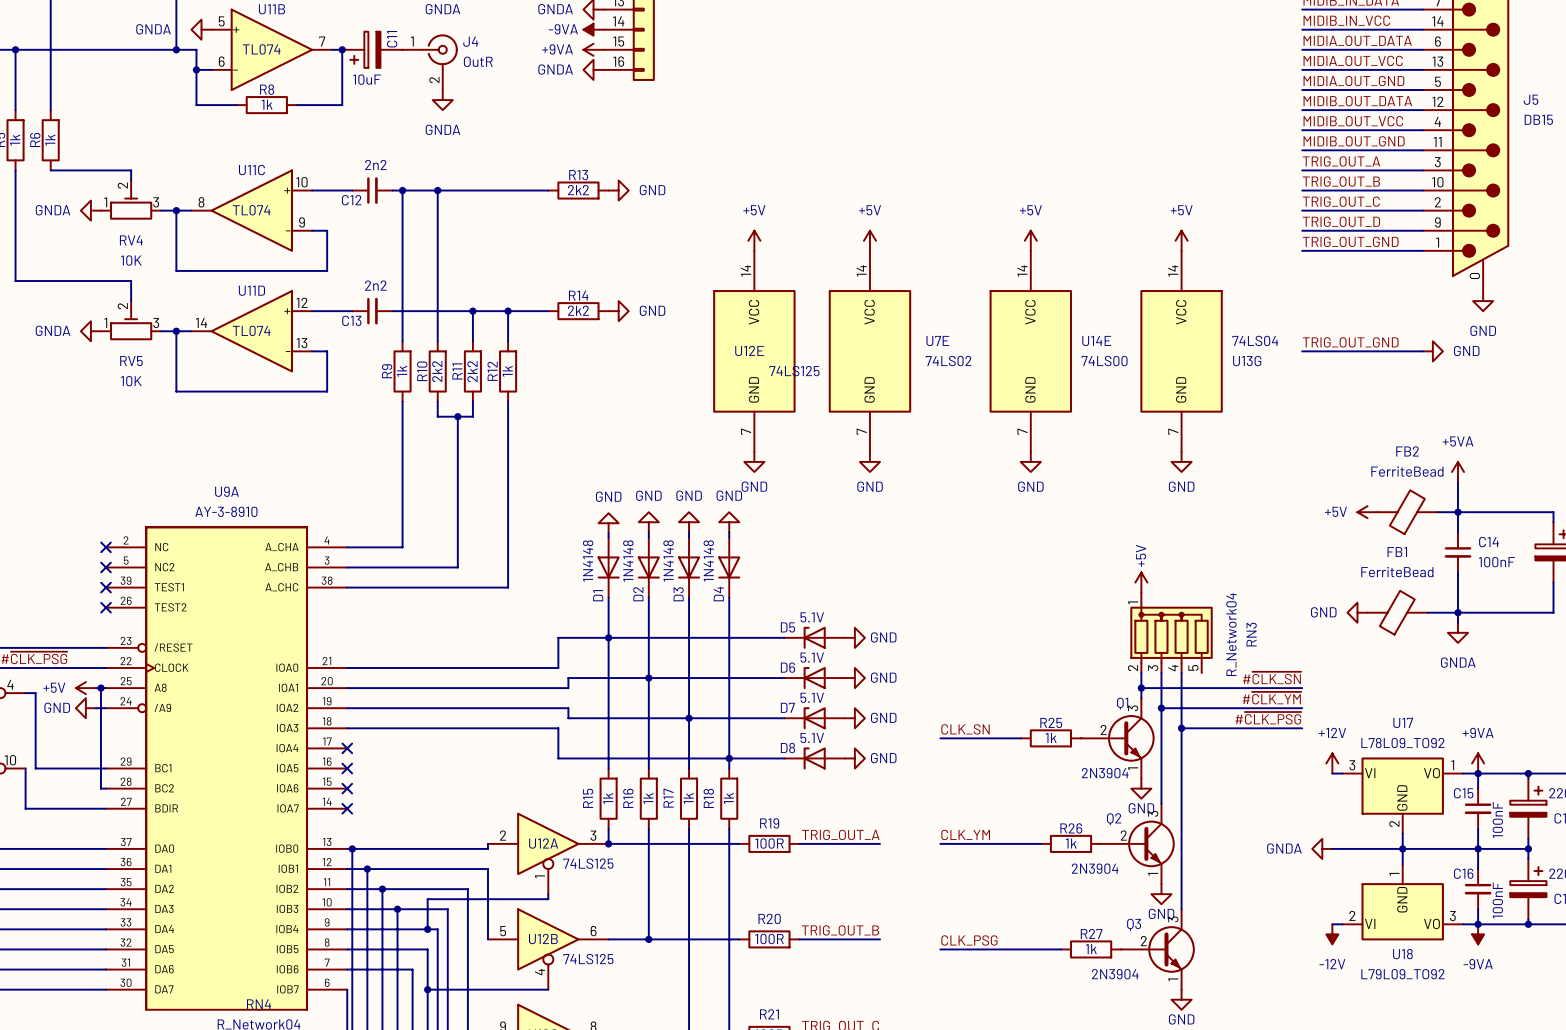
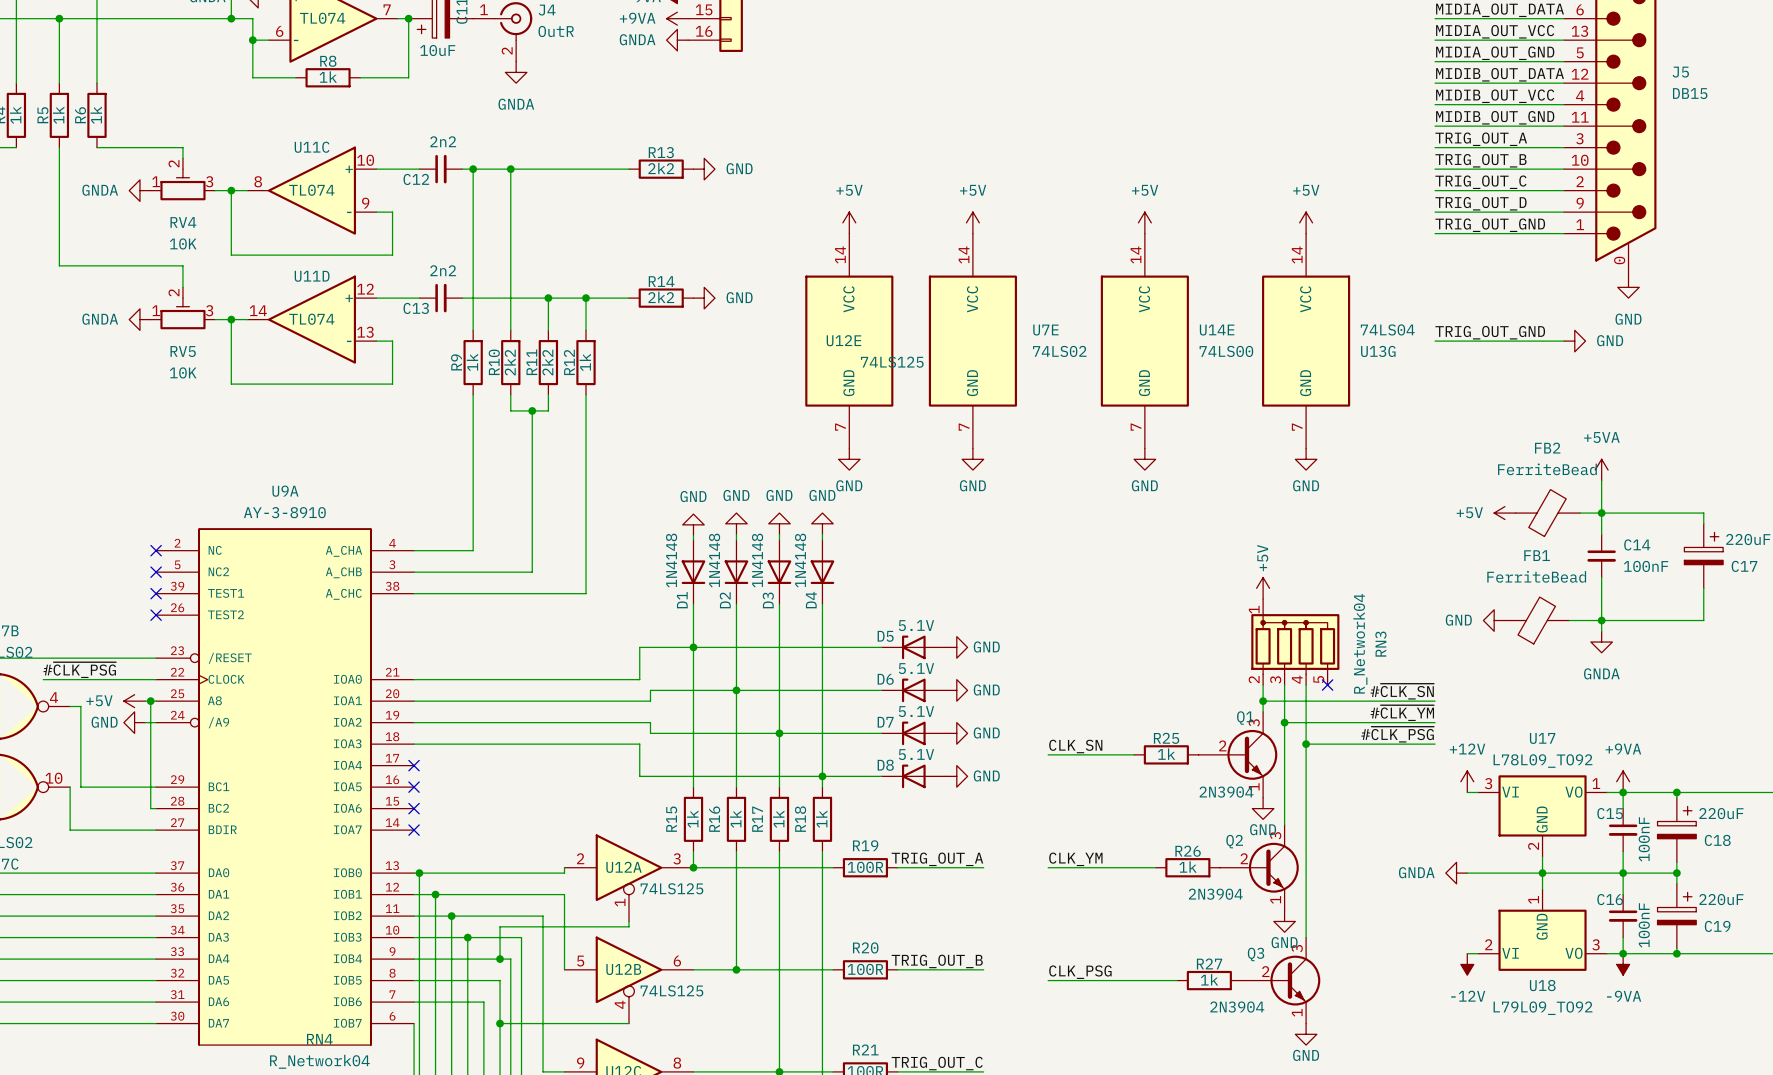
no-connect mark: none -> (1327, 685)

